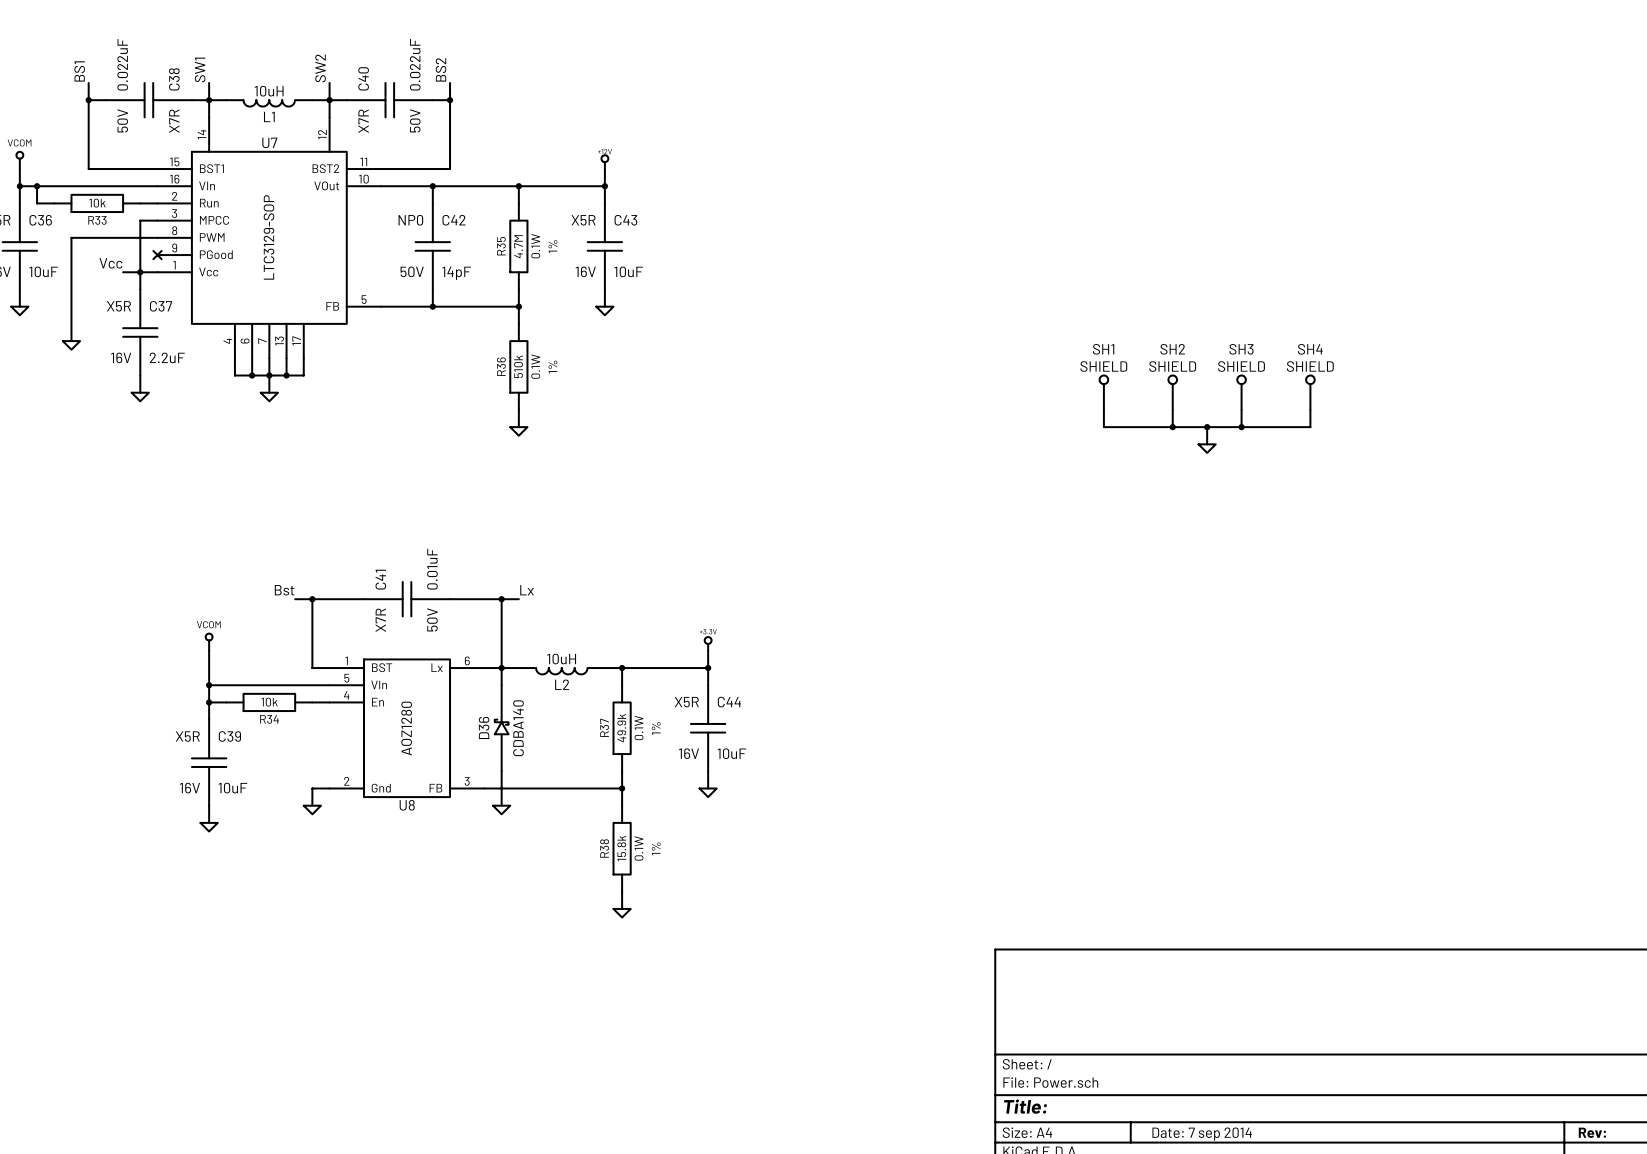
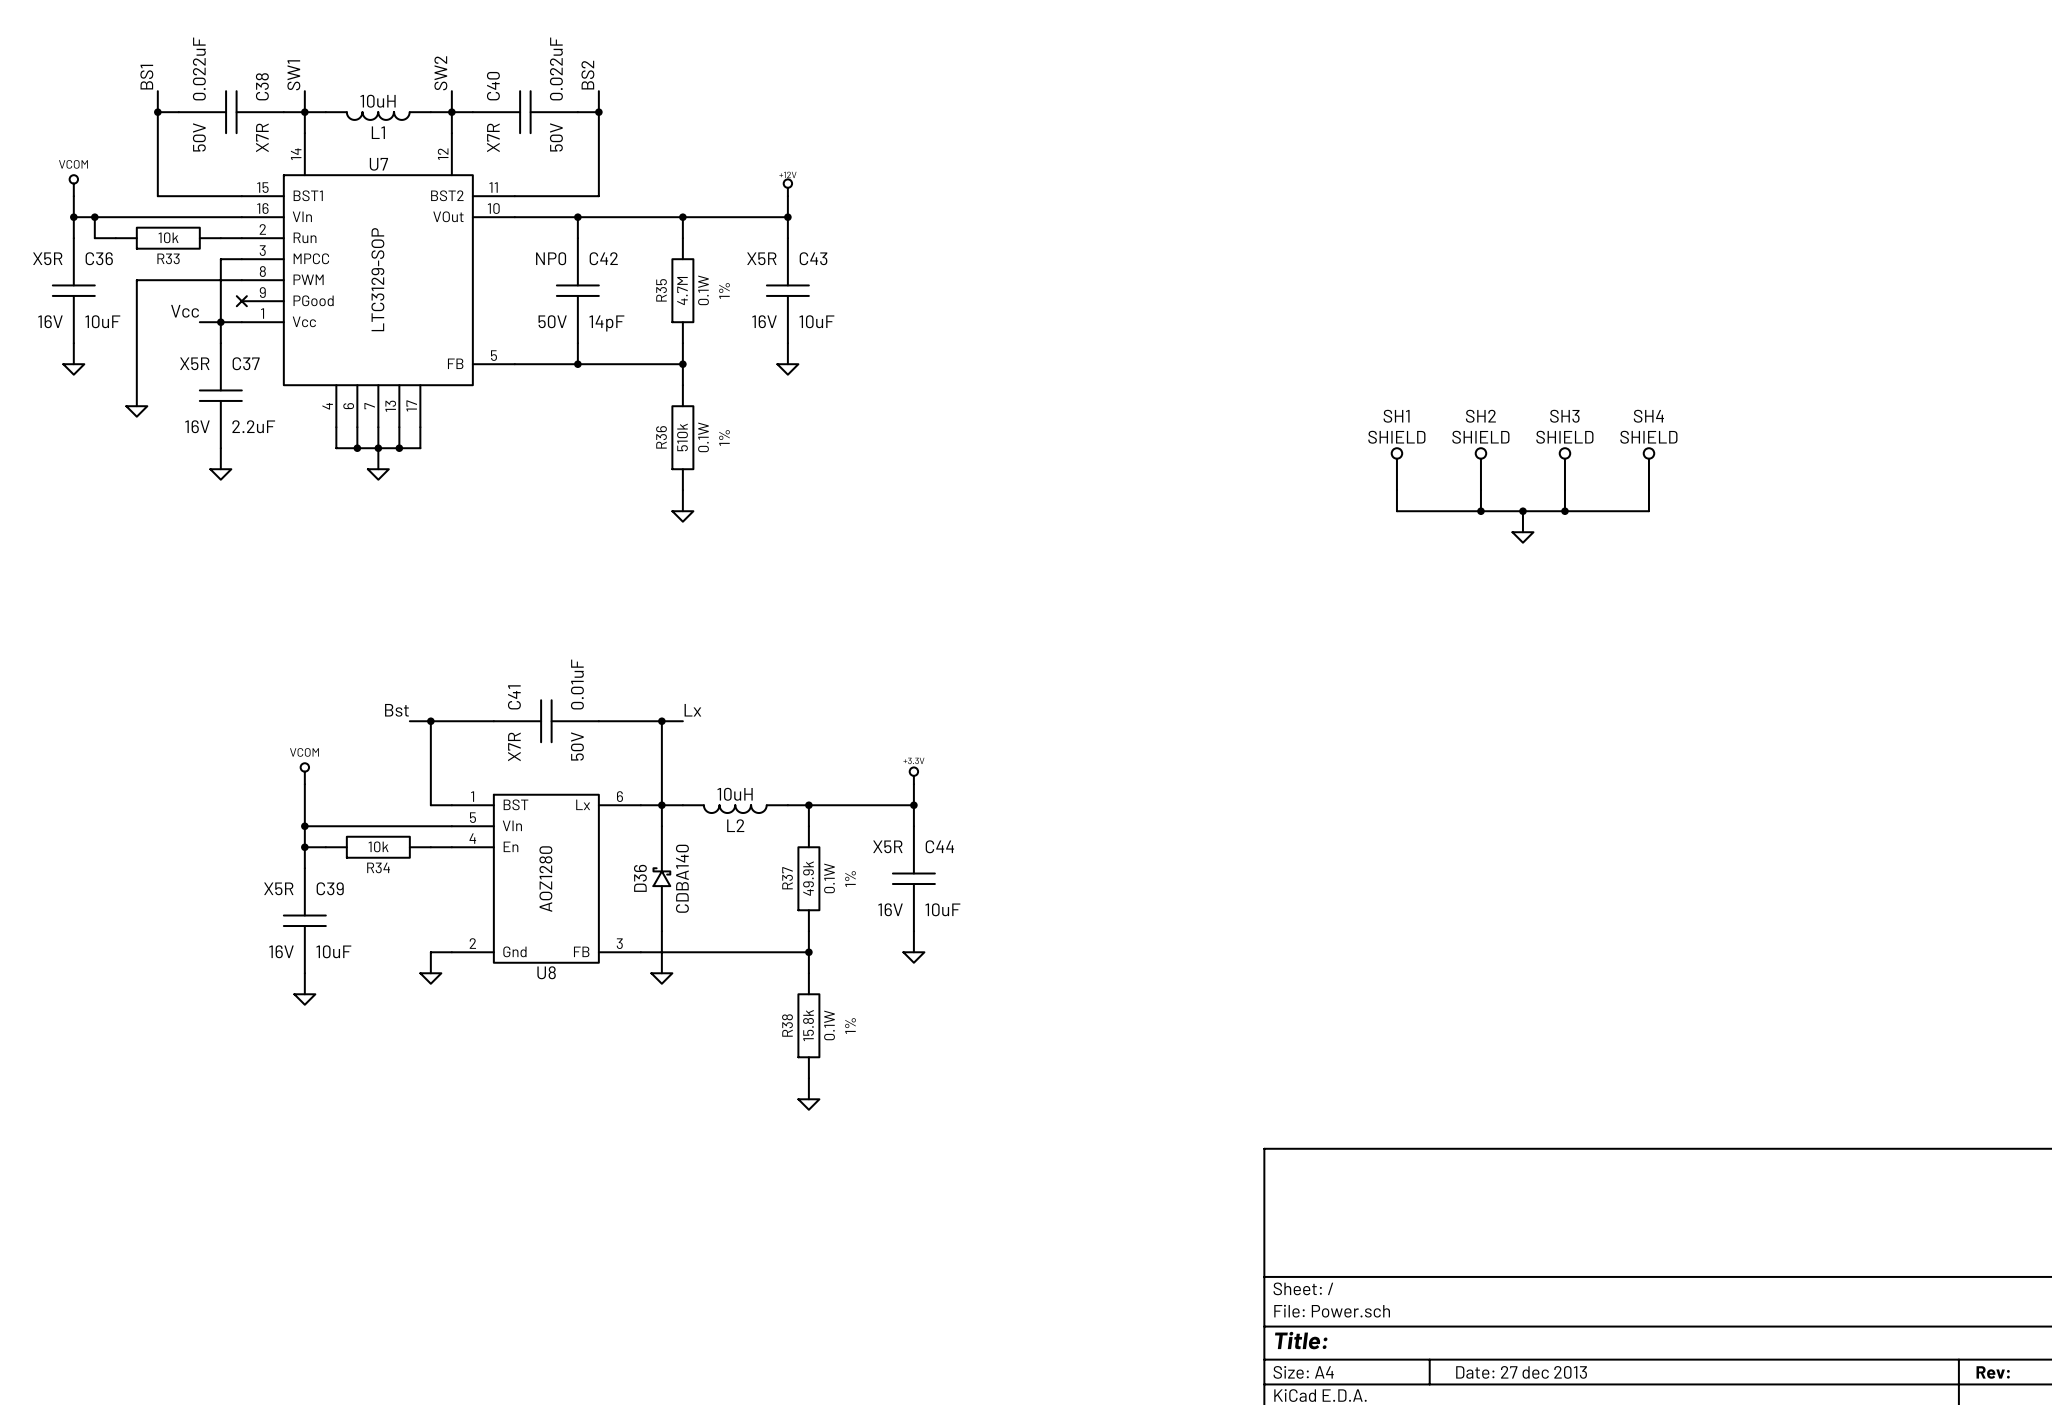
title block: Date: 7 sep 2014 (1202, 1134) -> Date: 27 dec 2013 (1521, 1372)

